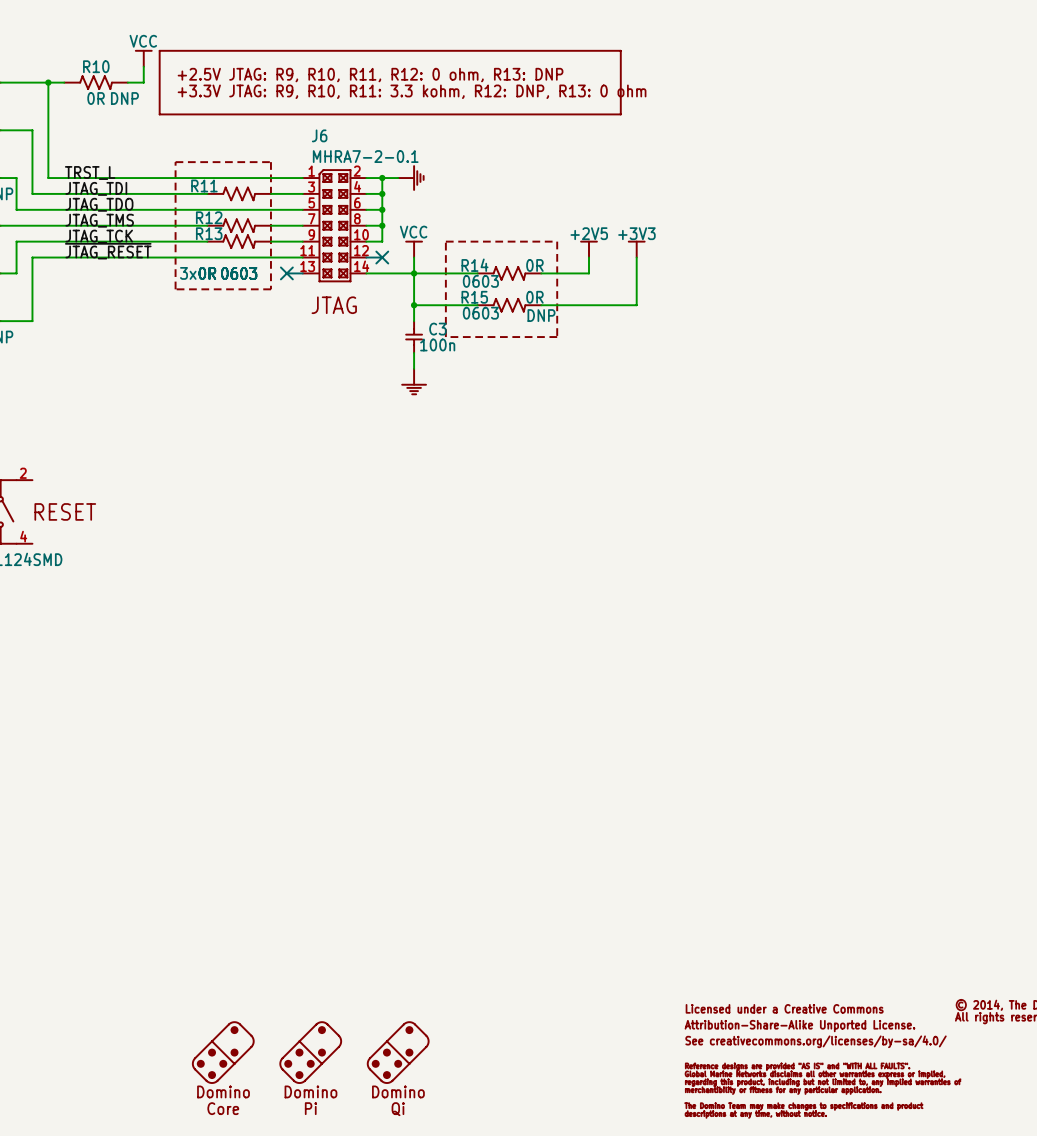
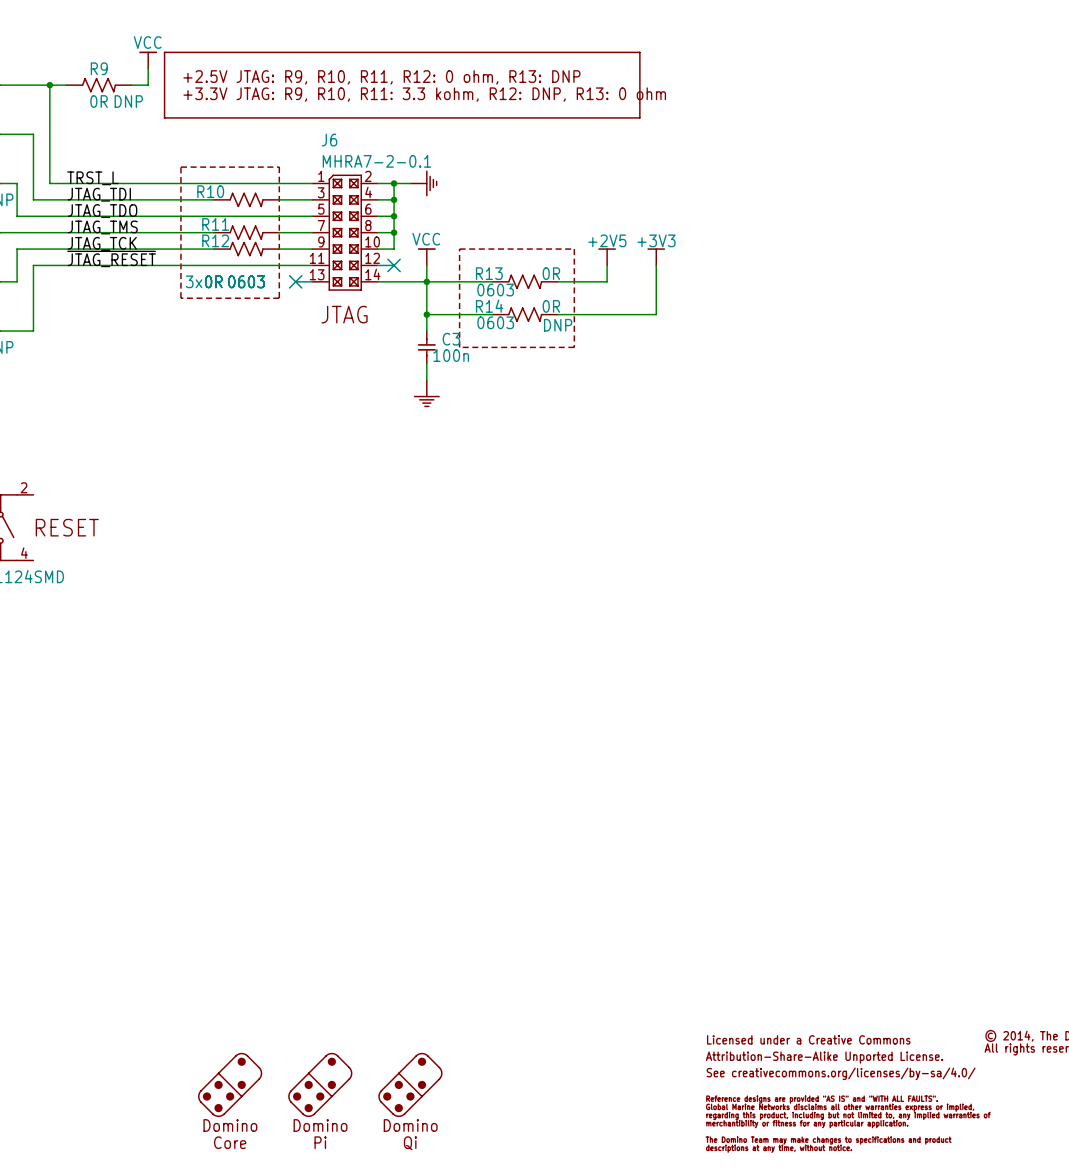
R10 name: R10 (96, 66) -> R9 (99, 68)
R11 name: R11 (204, 185) -> R10 (210, 191)
R12 name: R12 (209, 217) -> R11 (215, 224)
R13 name: R13 (209, 233) -> R12 (215, 240)
R14 name: R14 (474, 265) -> R13 (489, 273)
R15 name: R15 (474, 297) -> R14 (489, 306)

